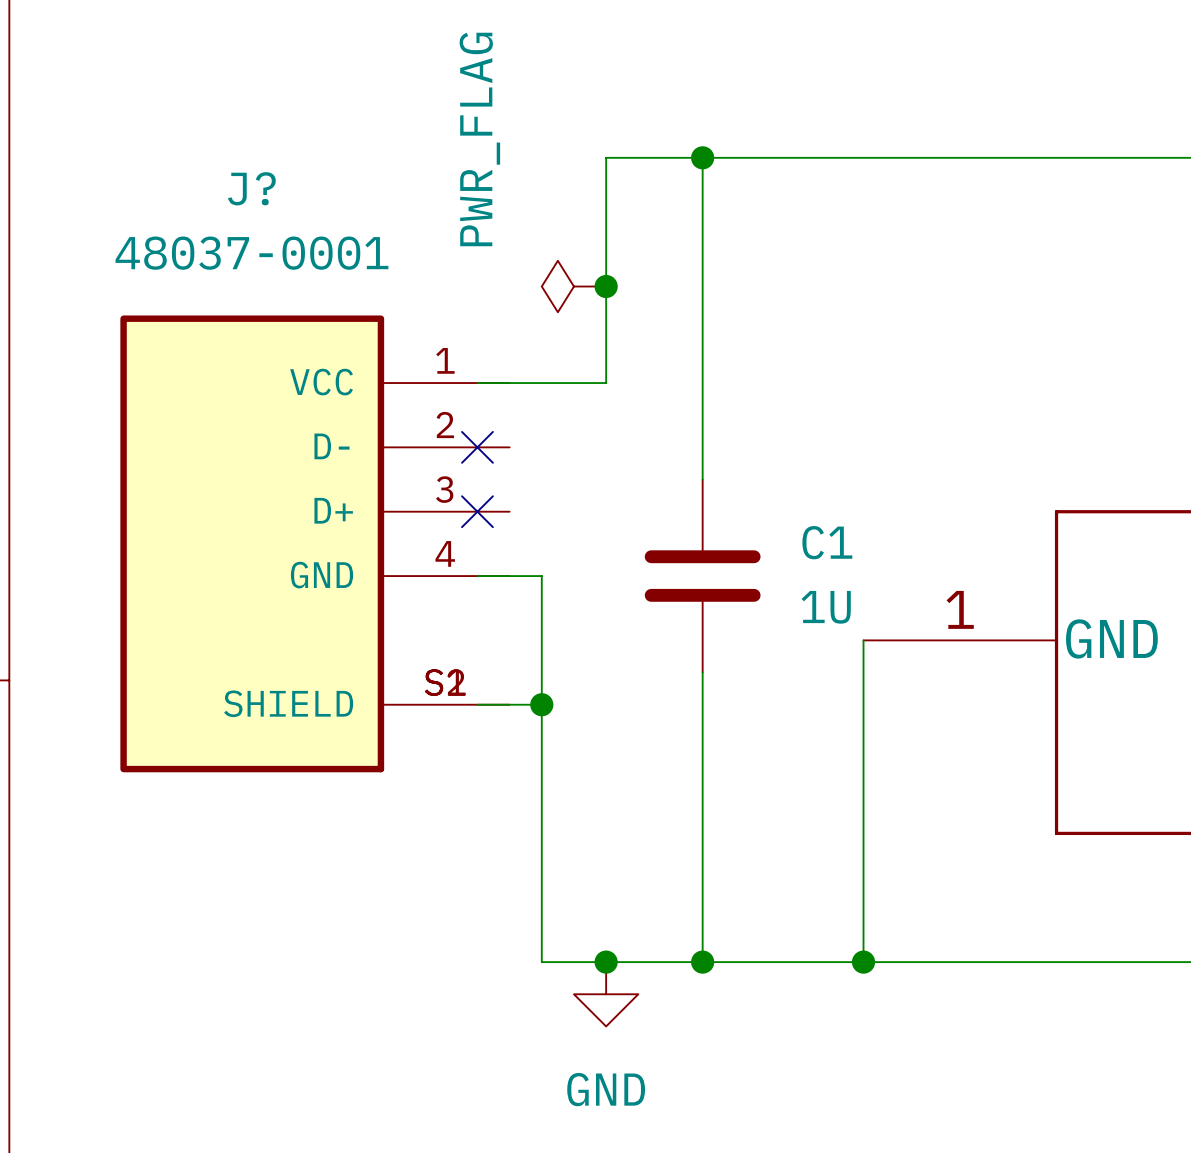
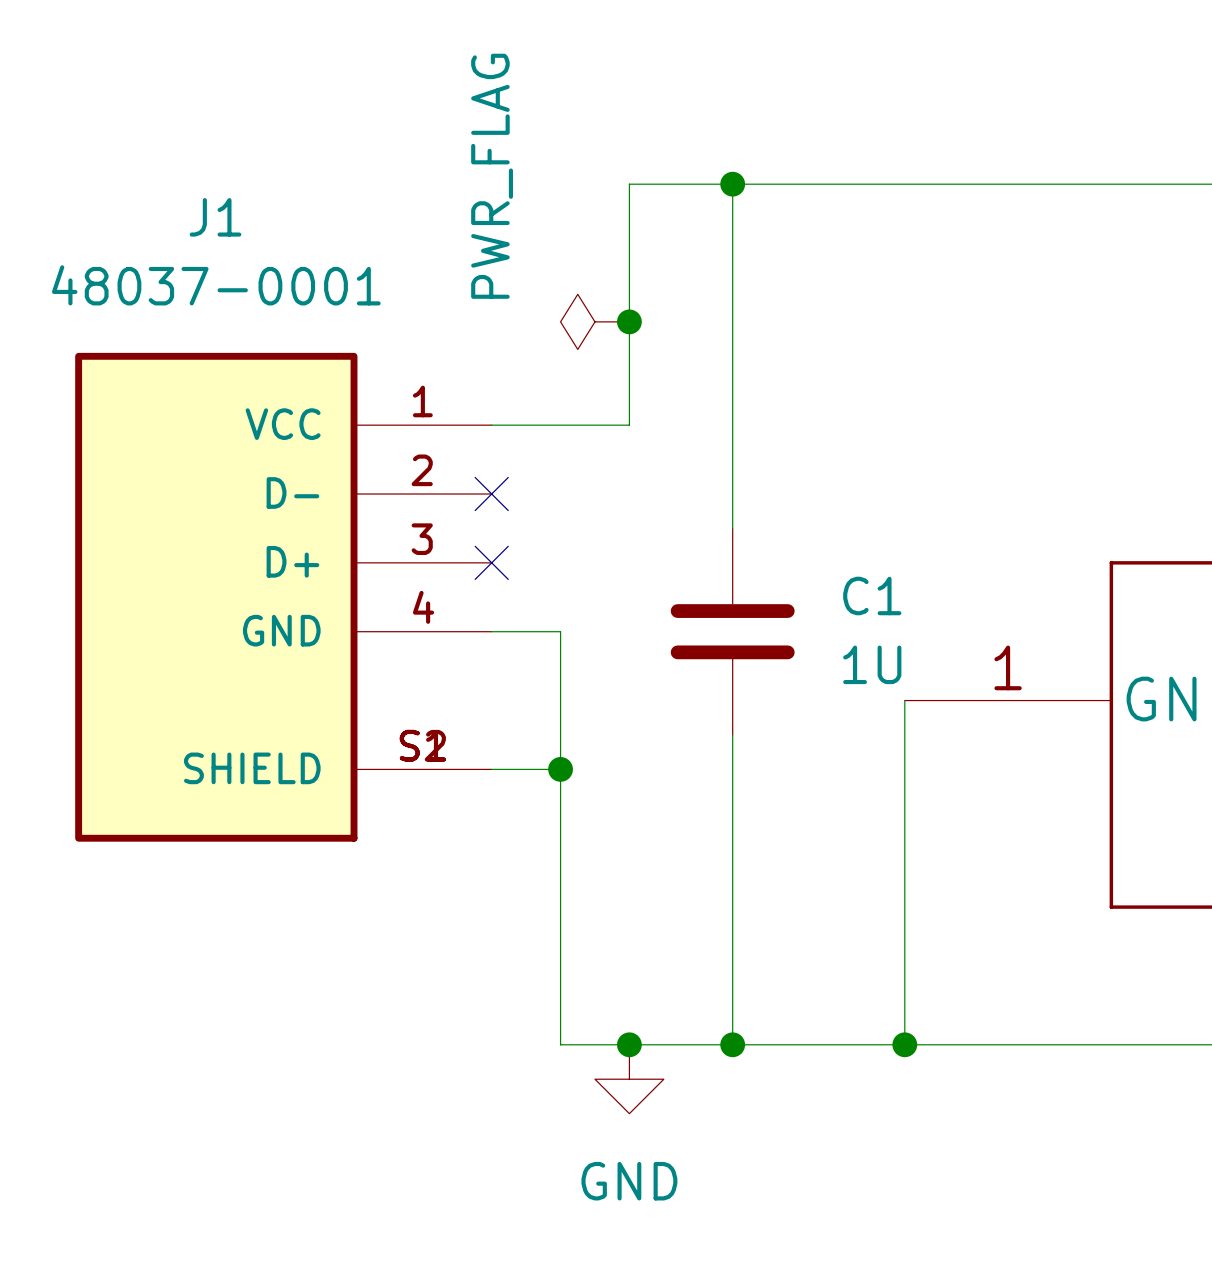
J1: none -> 48037-0001 (283, 597)
J?: 48037-0001 (314, 543) -> none

